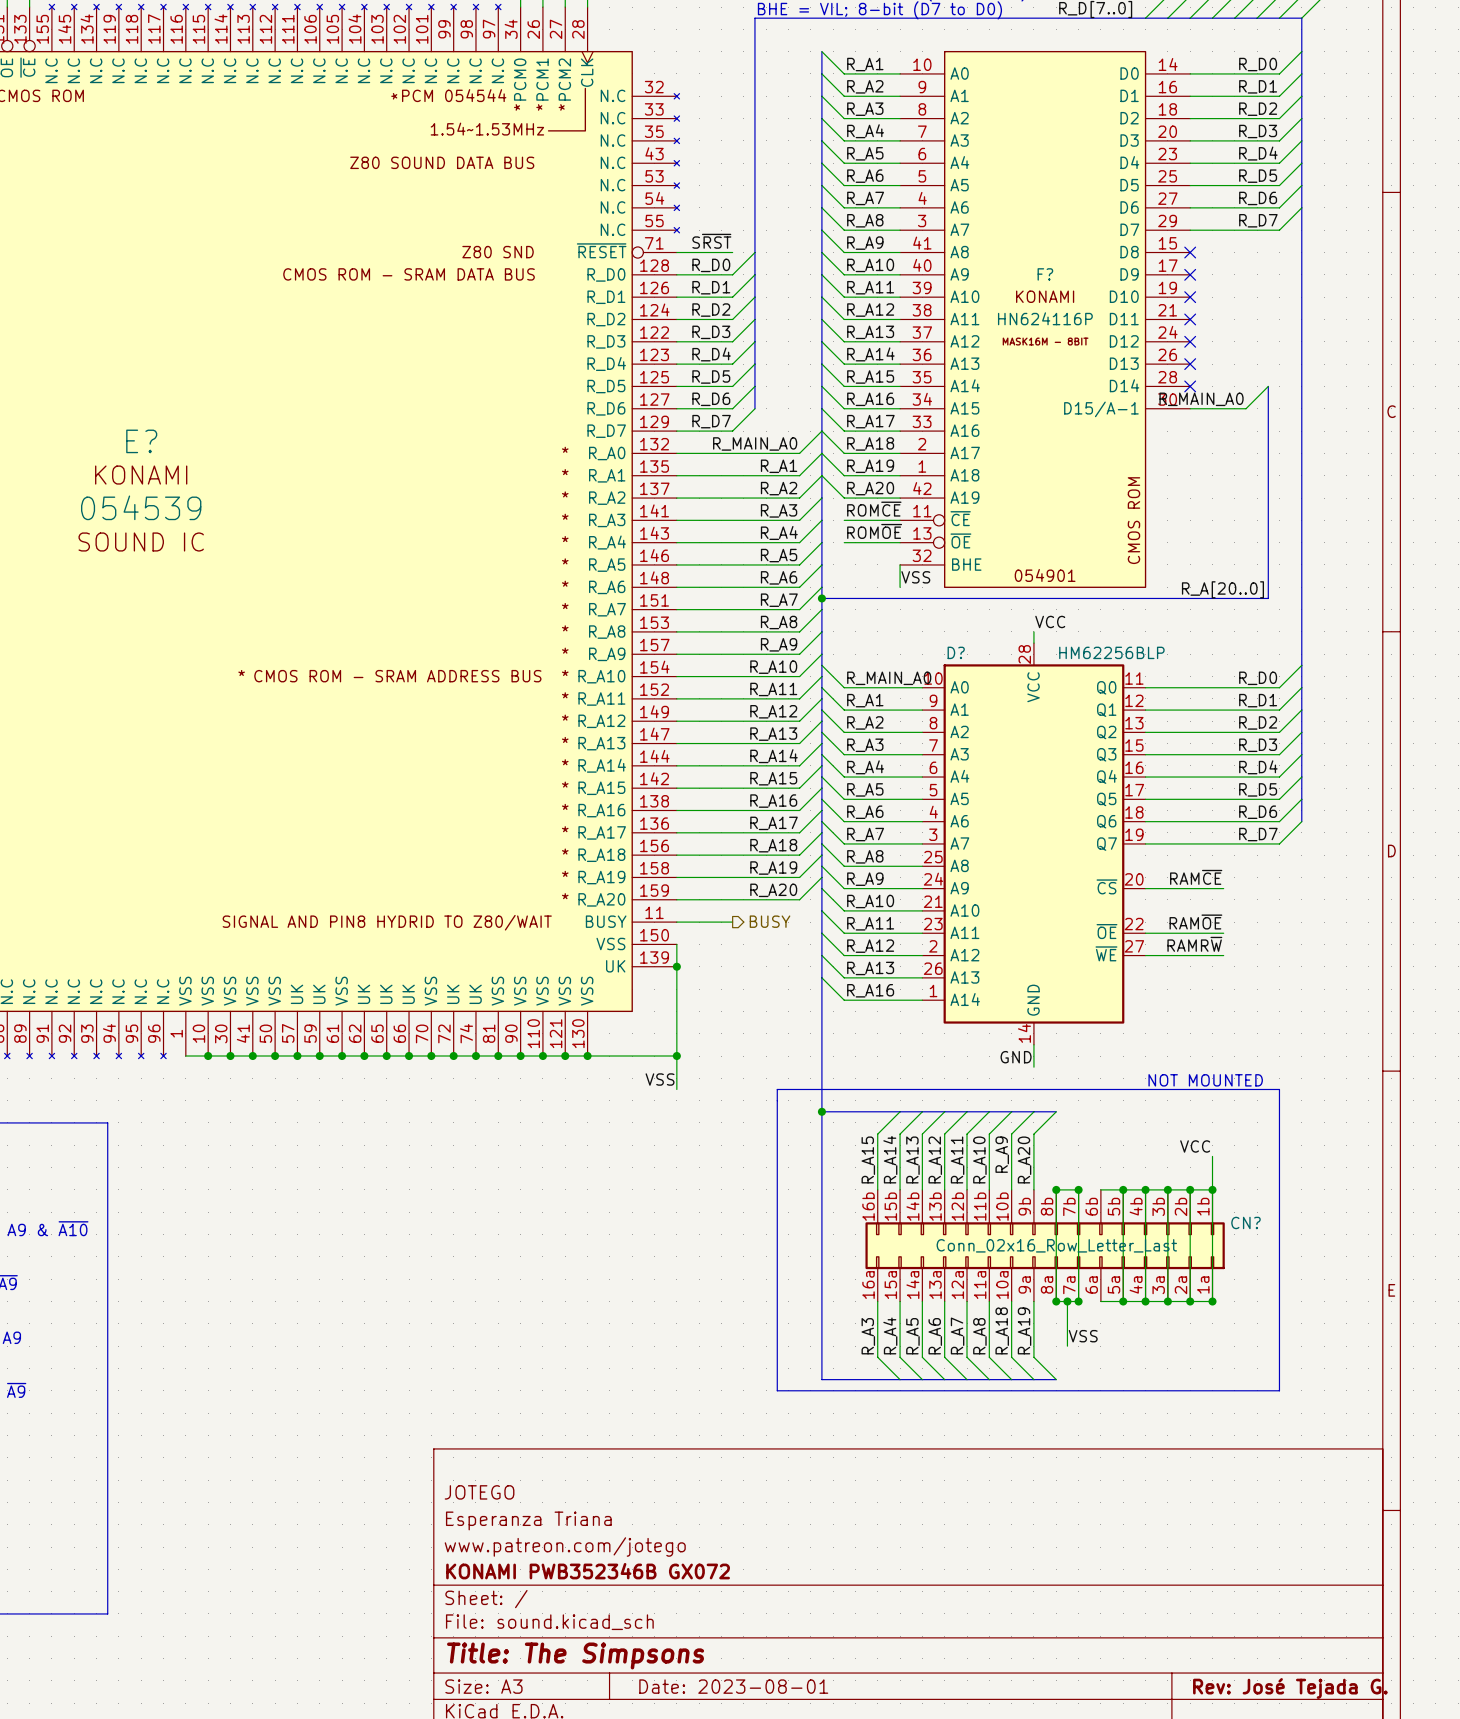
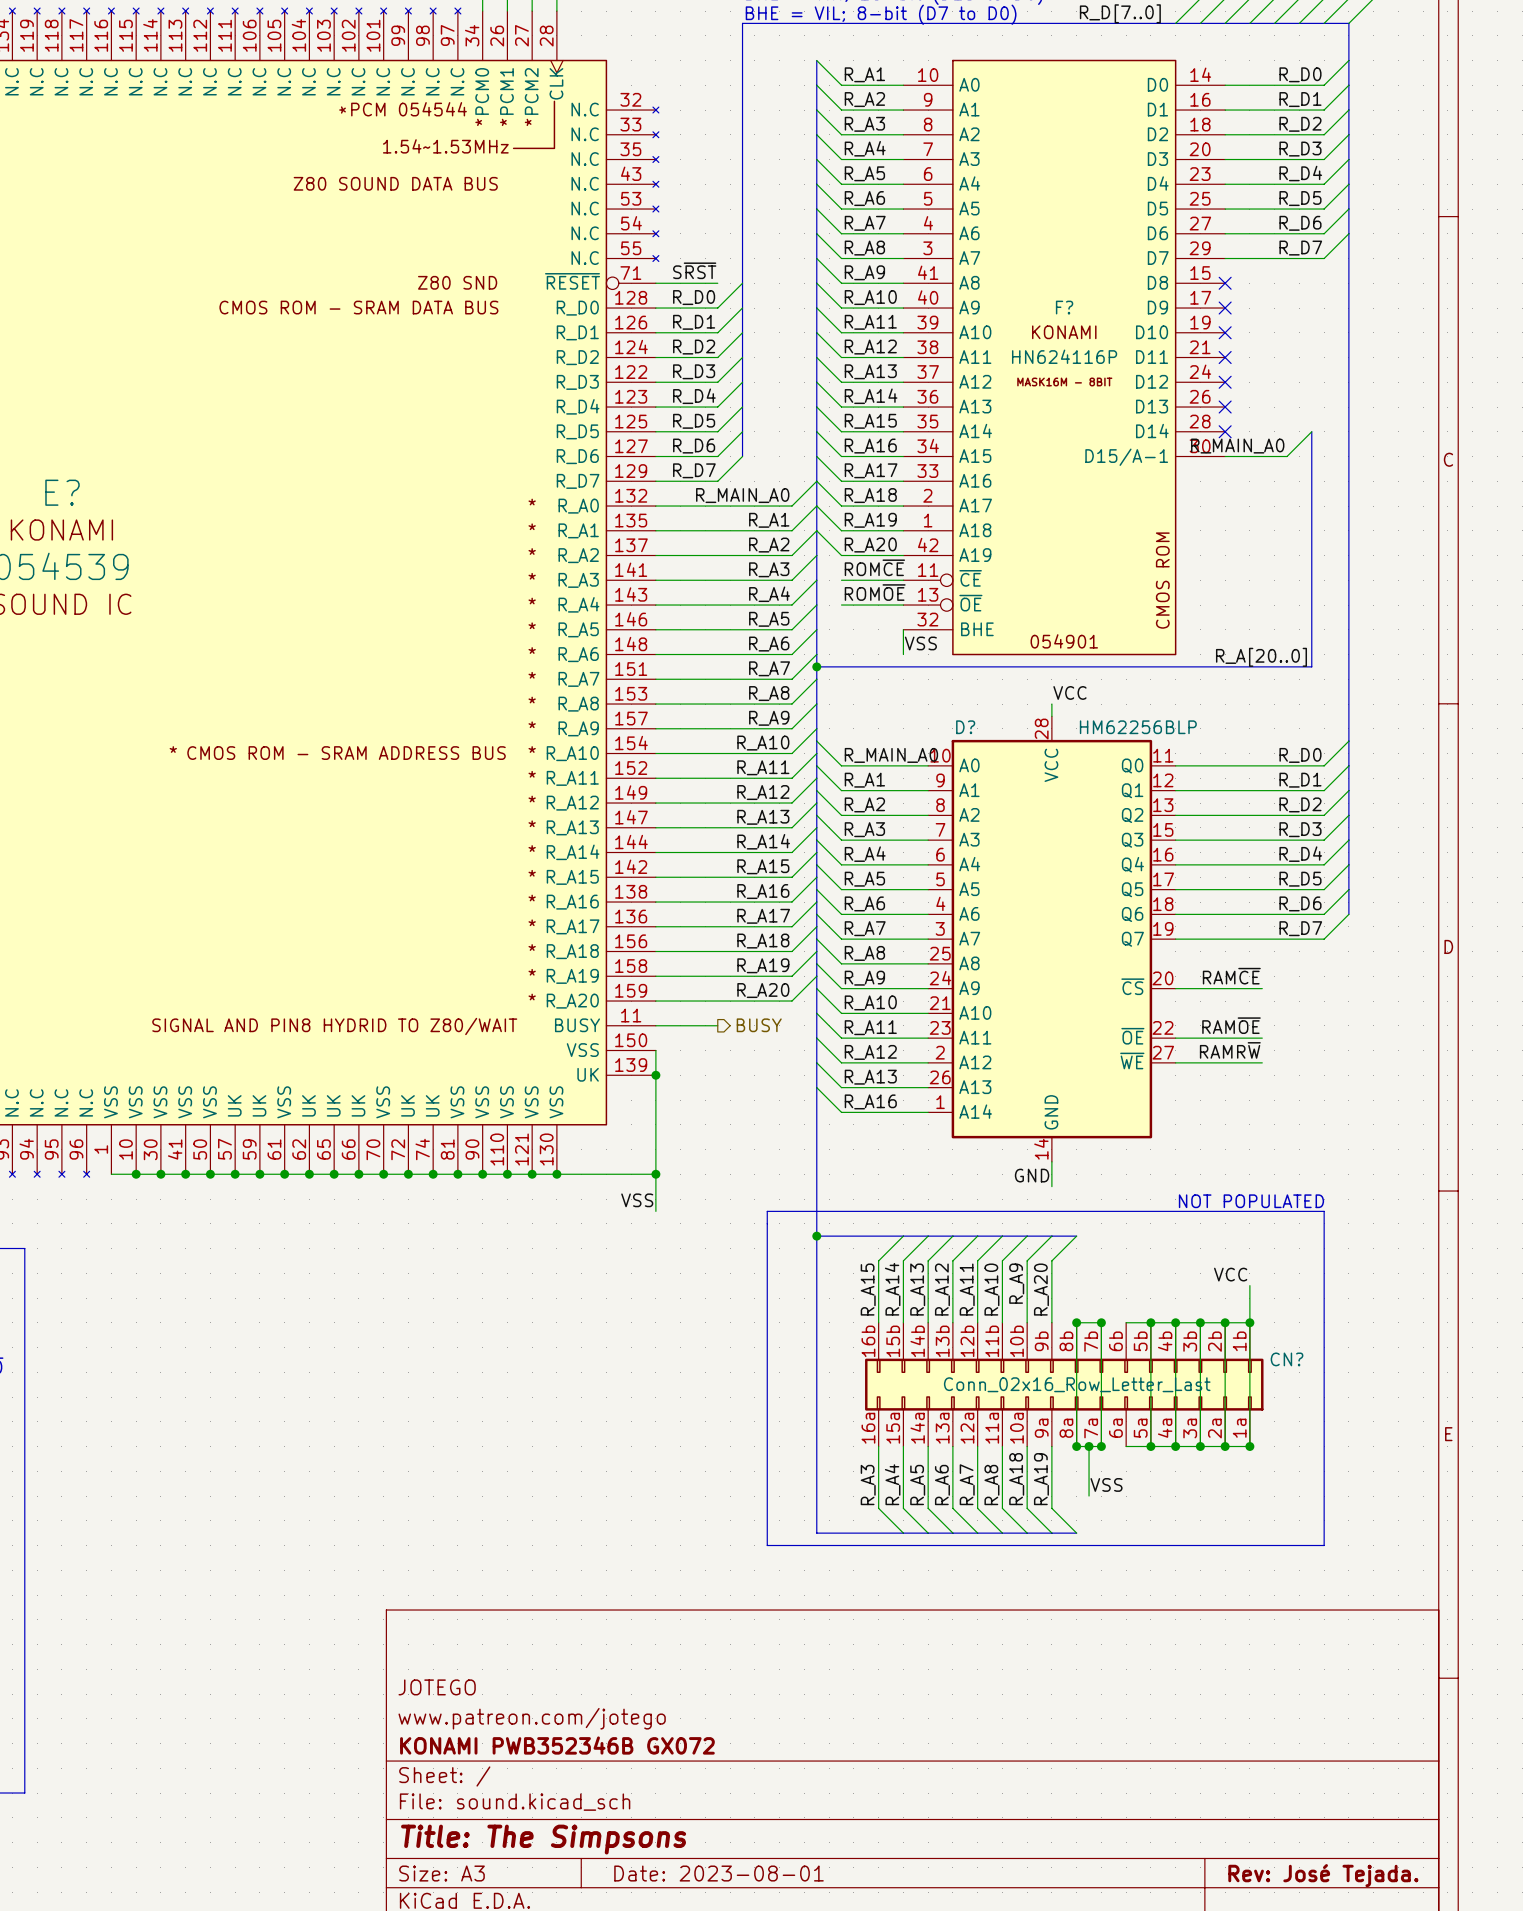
text: NOT MOUNTED (1205, 1080) -> NOT POPULATED (1251, 1201)
title block: JOTEGO (479, 1492) -> none
title block: Esperanza Triana (528, 1520) -> JOTEGO (437, 1687)
title block: Rev: José Tejada G. (1290, 1688) -> Rev: José Tejada. (1323, 1875)

